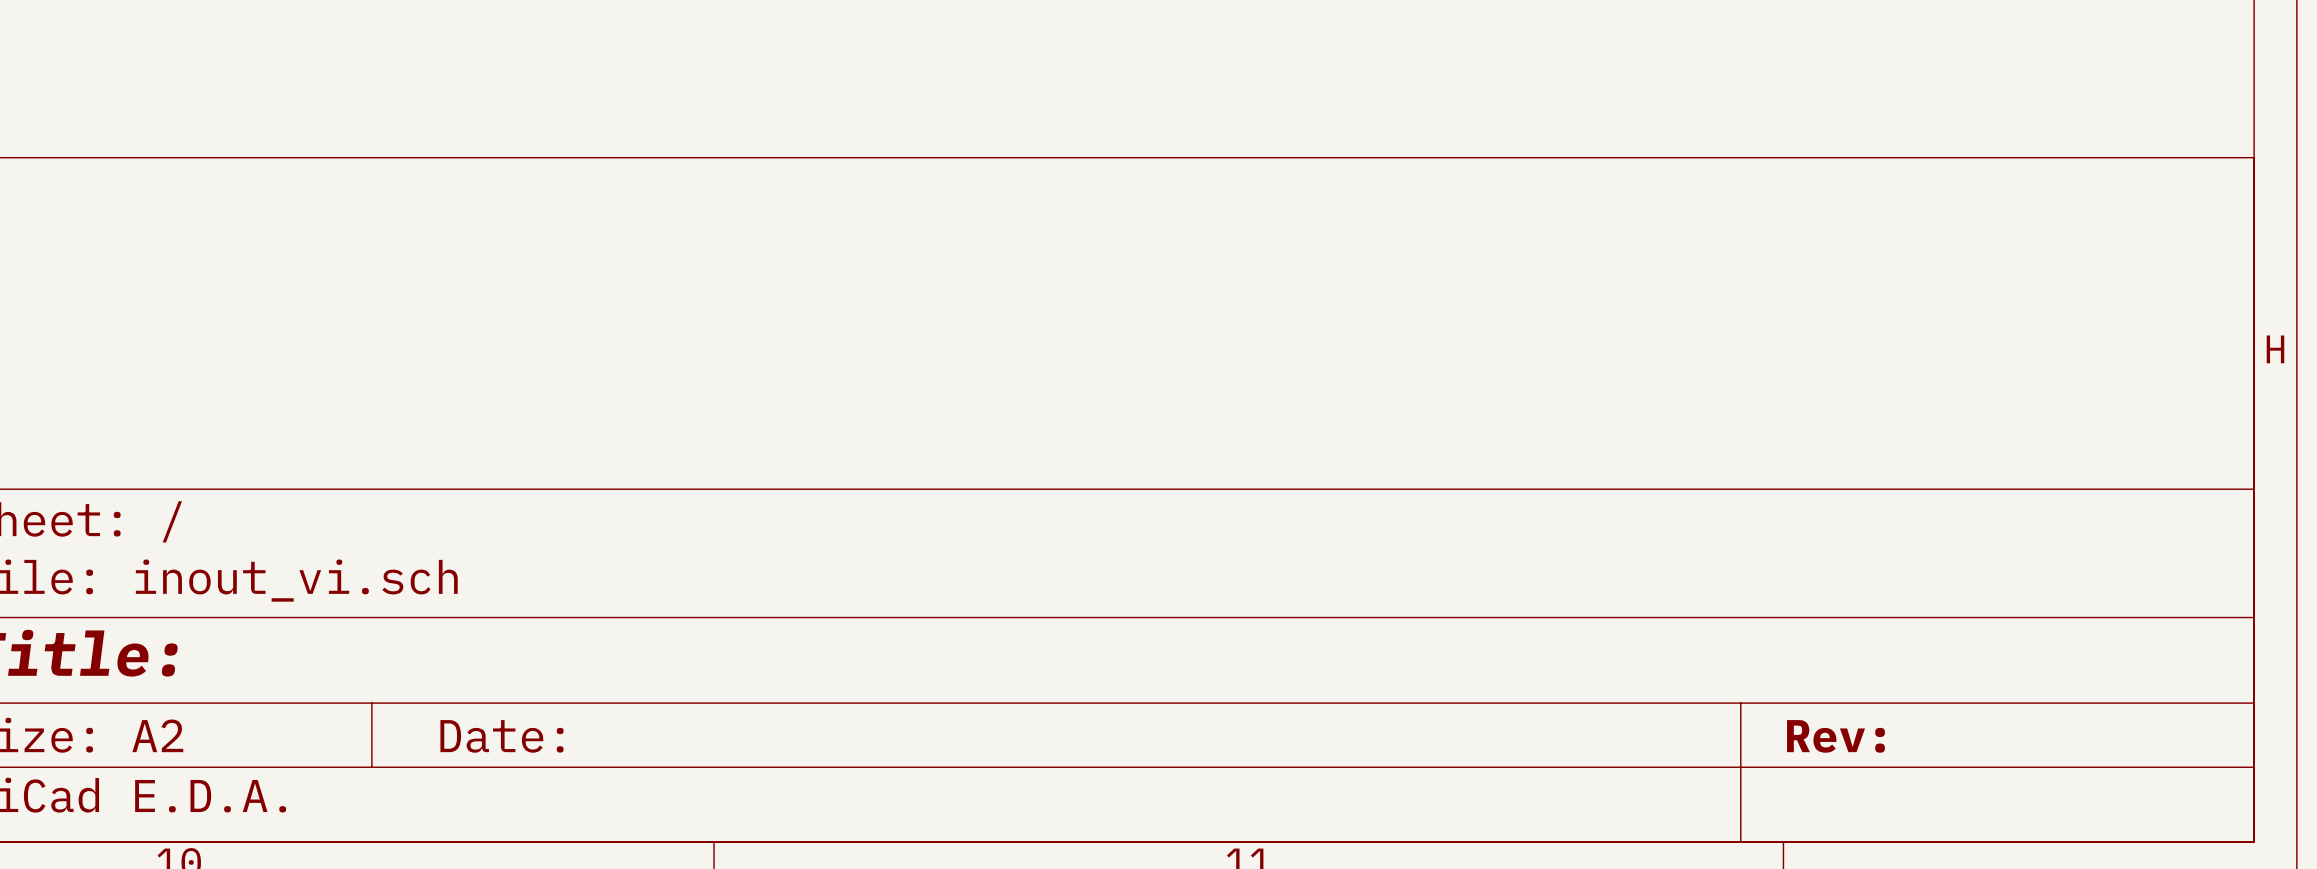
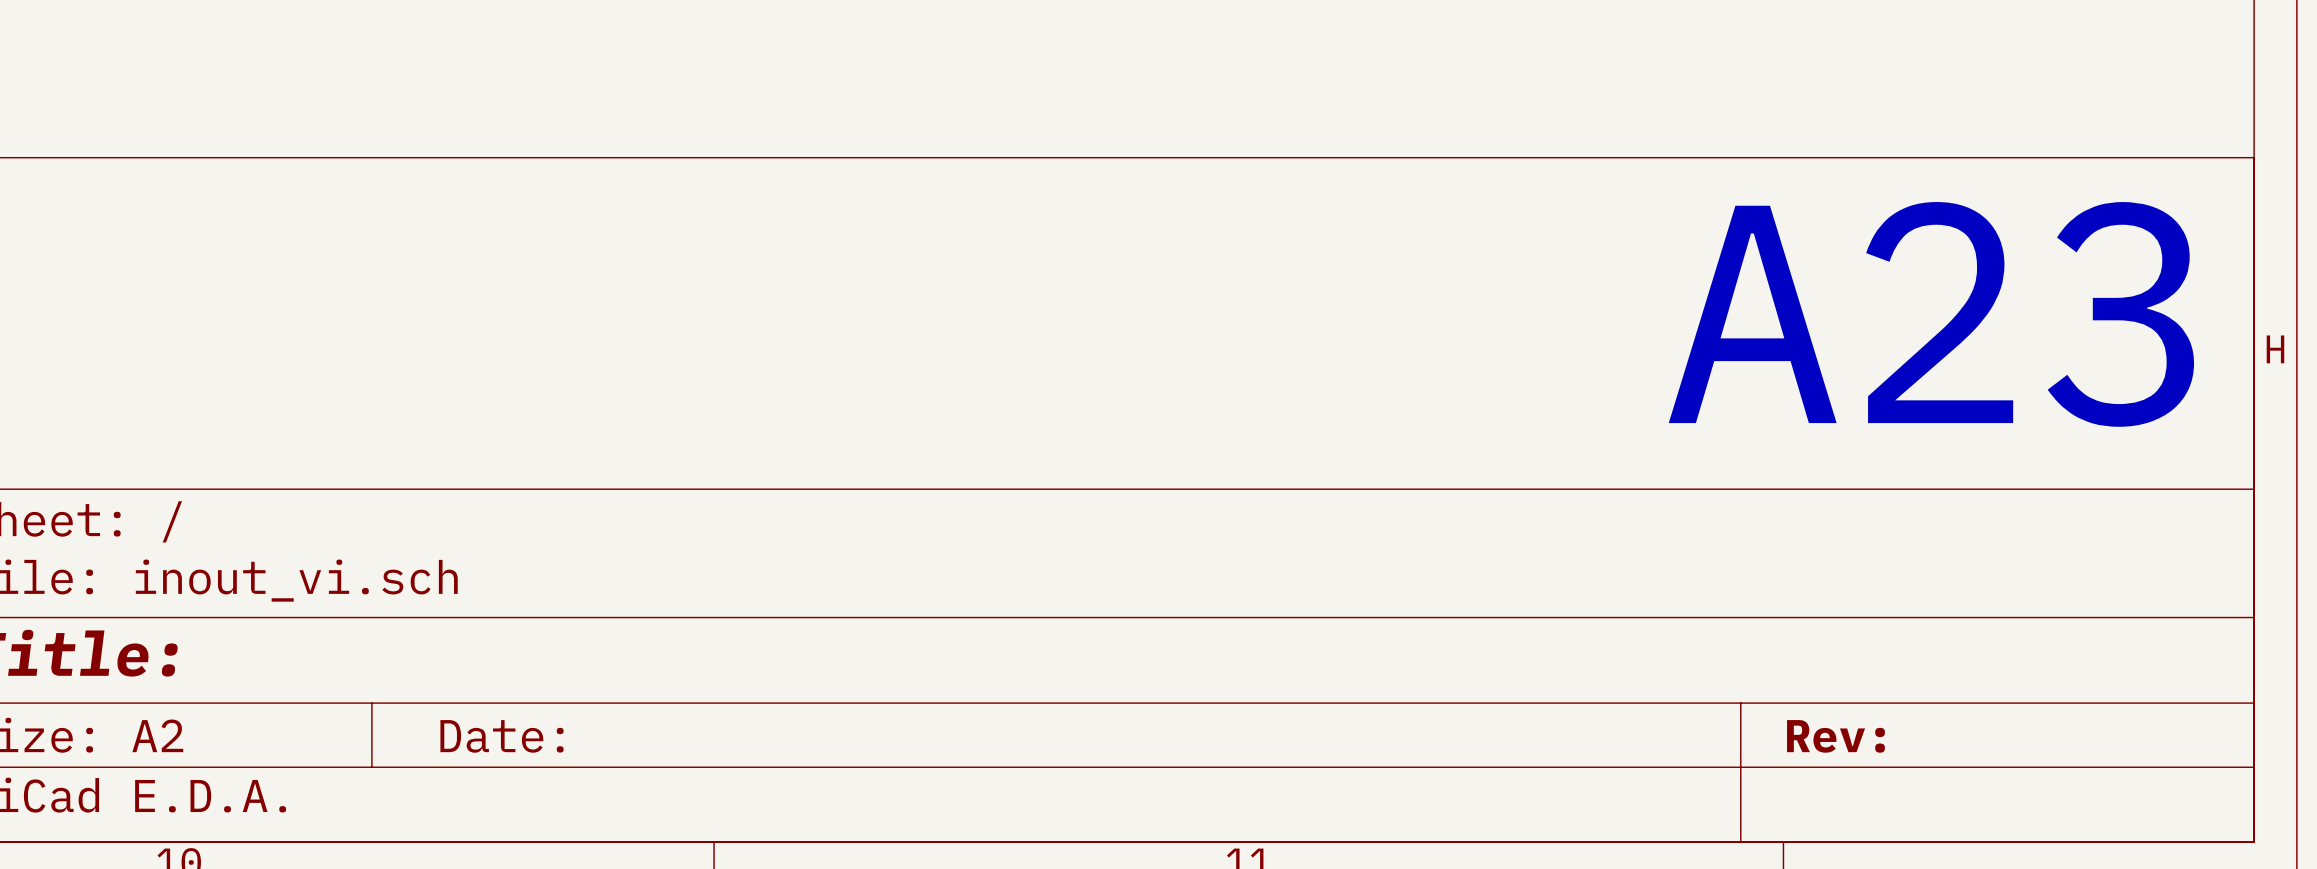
text: none -> A23 (1931, 314)

